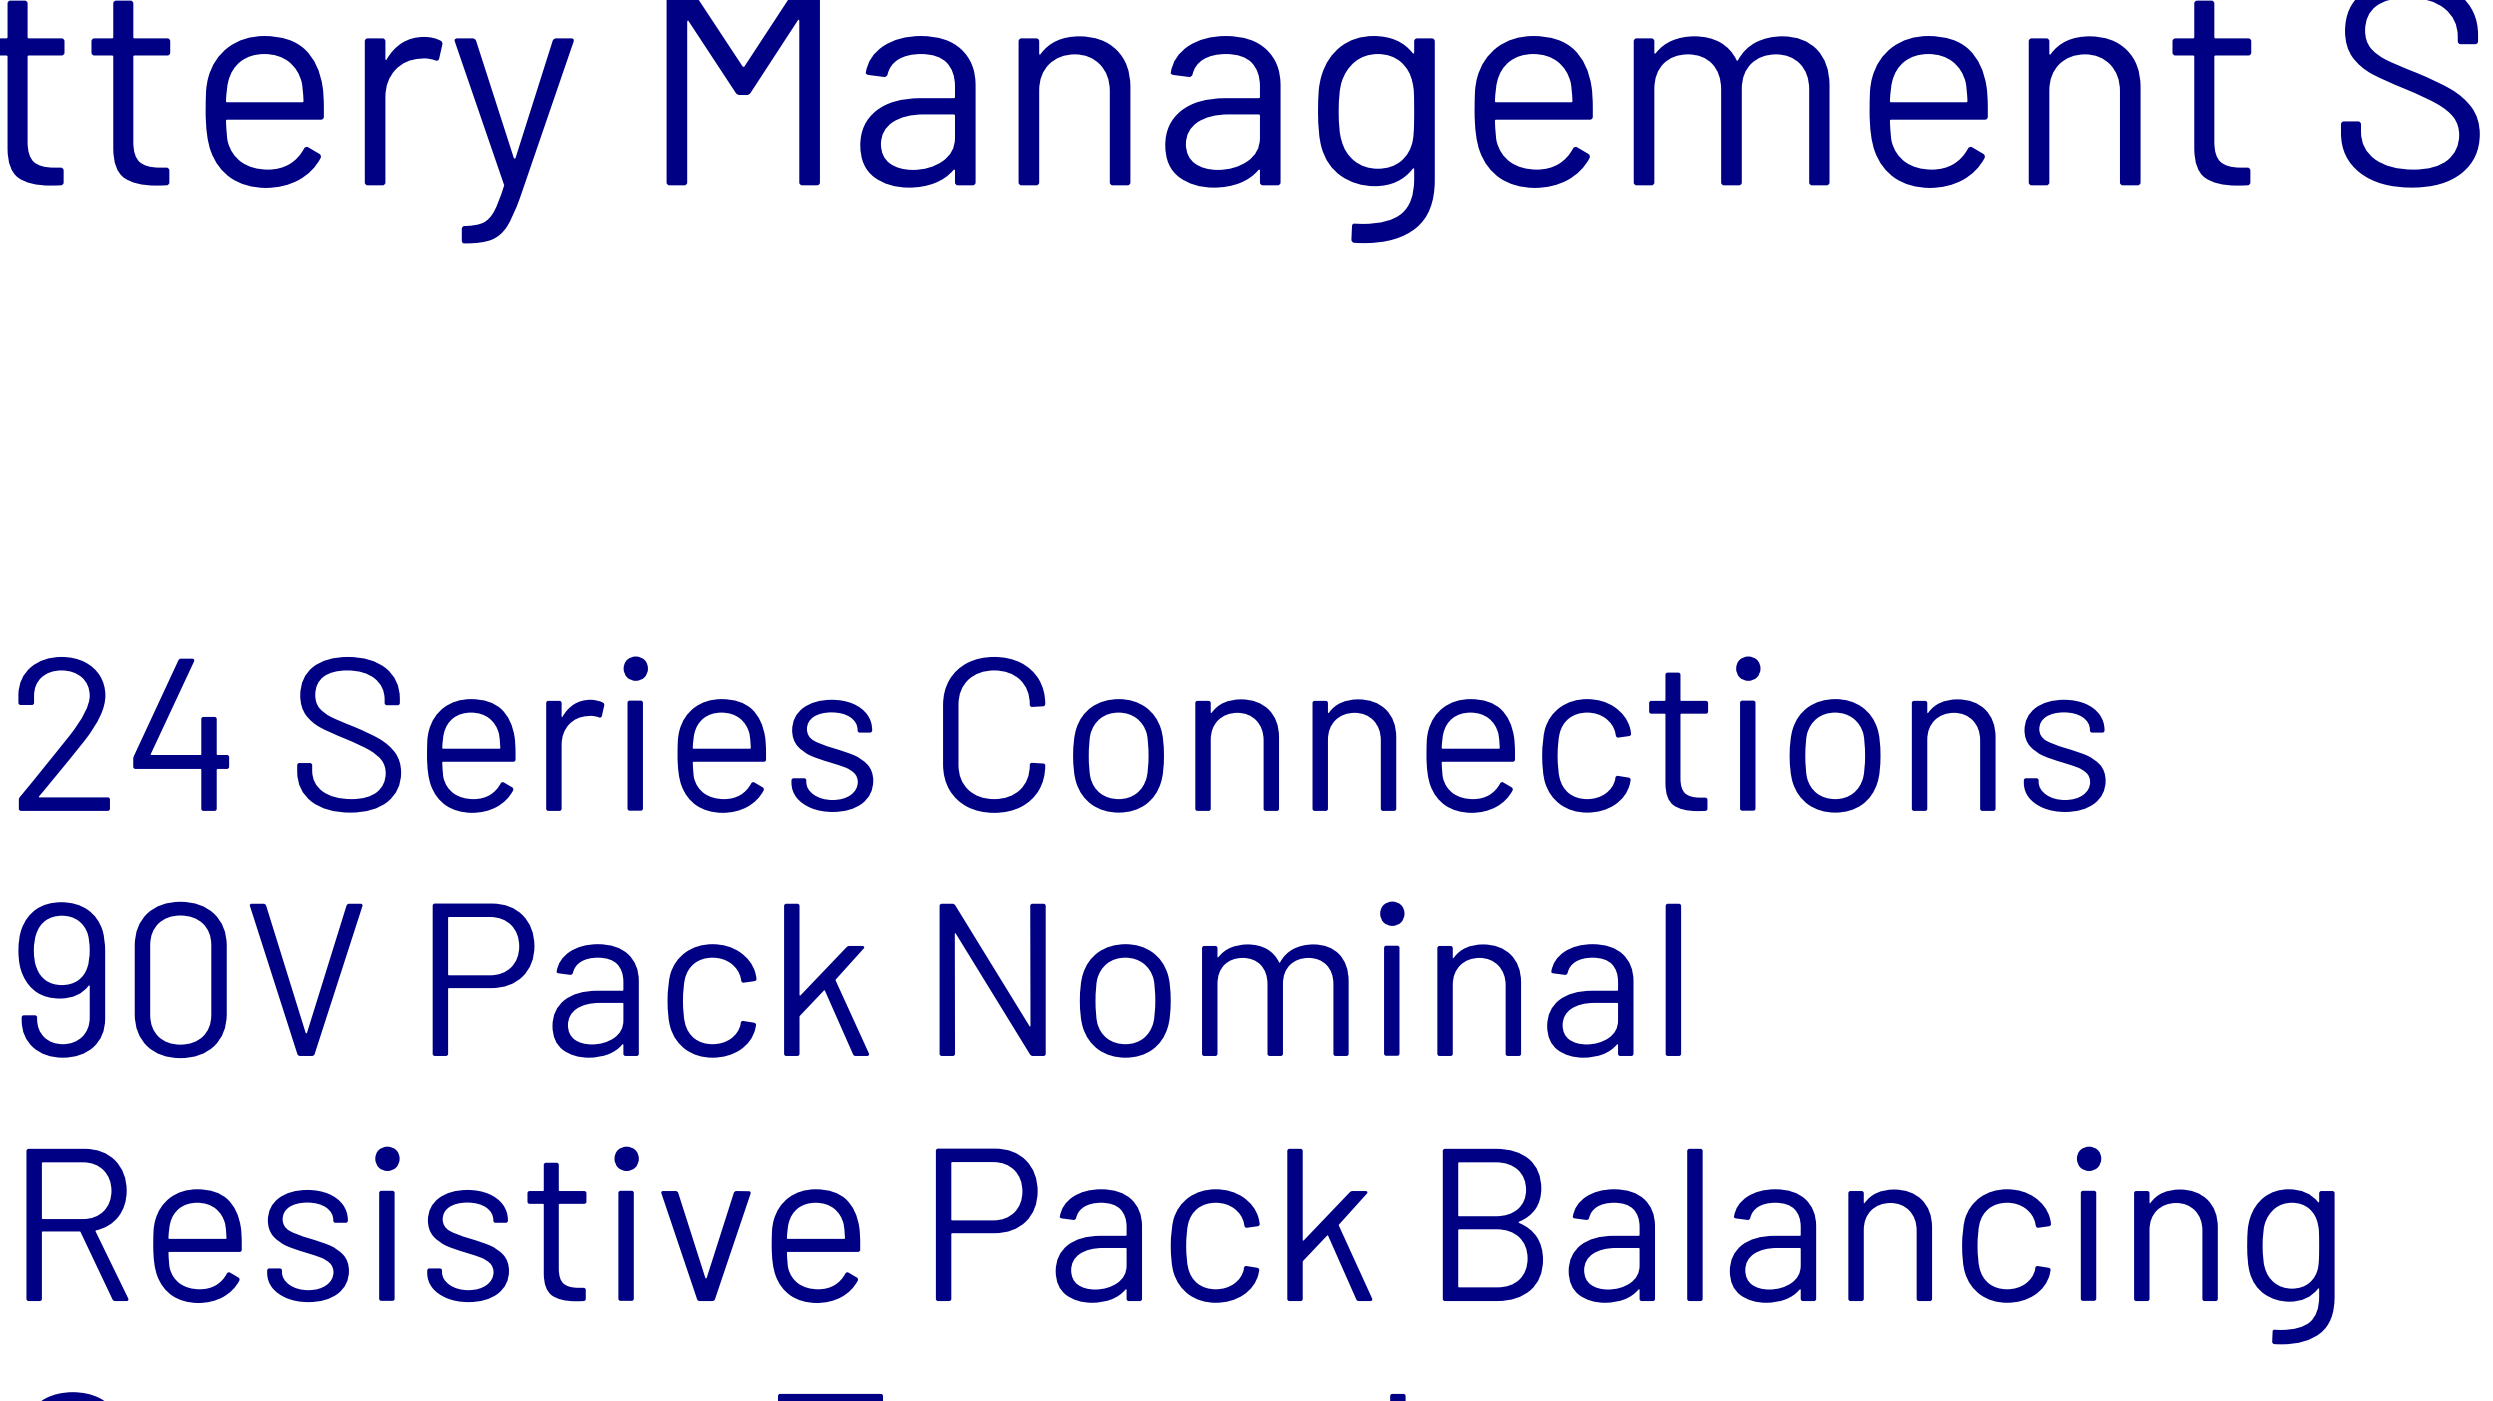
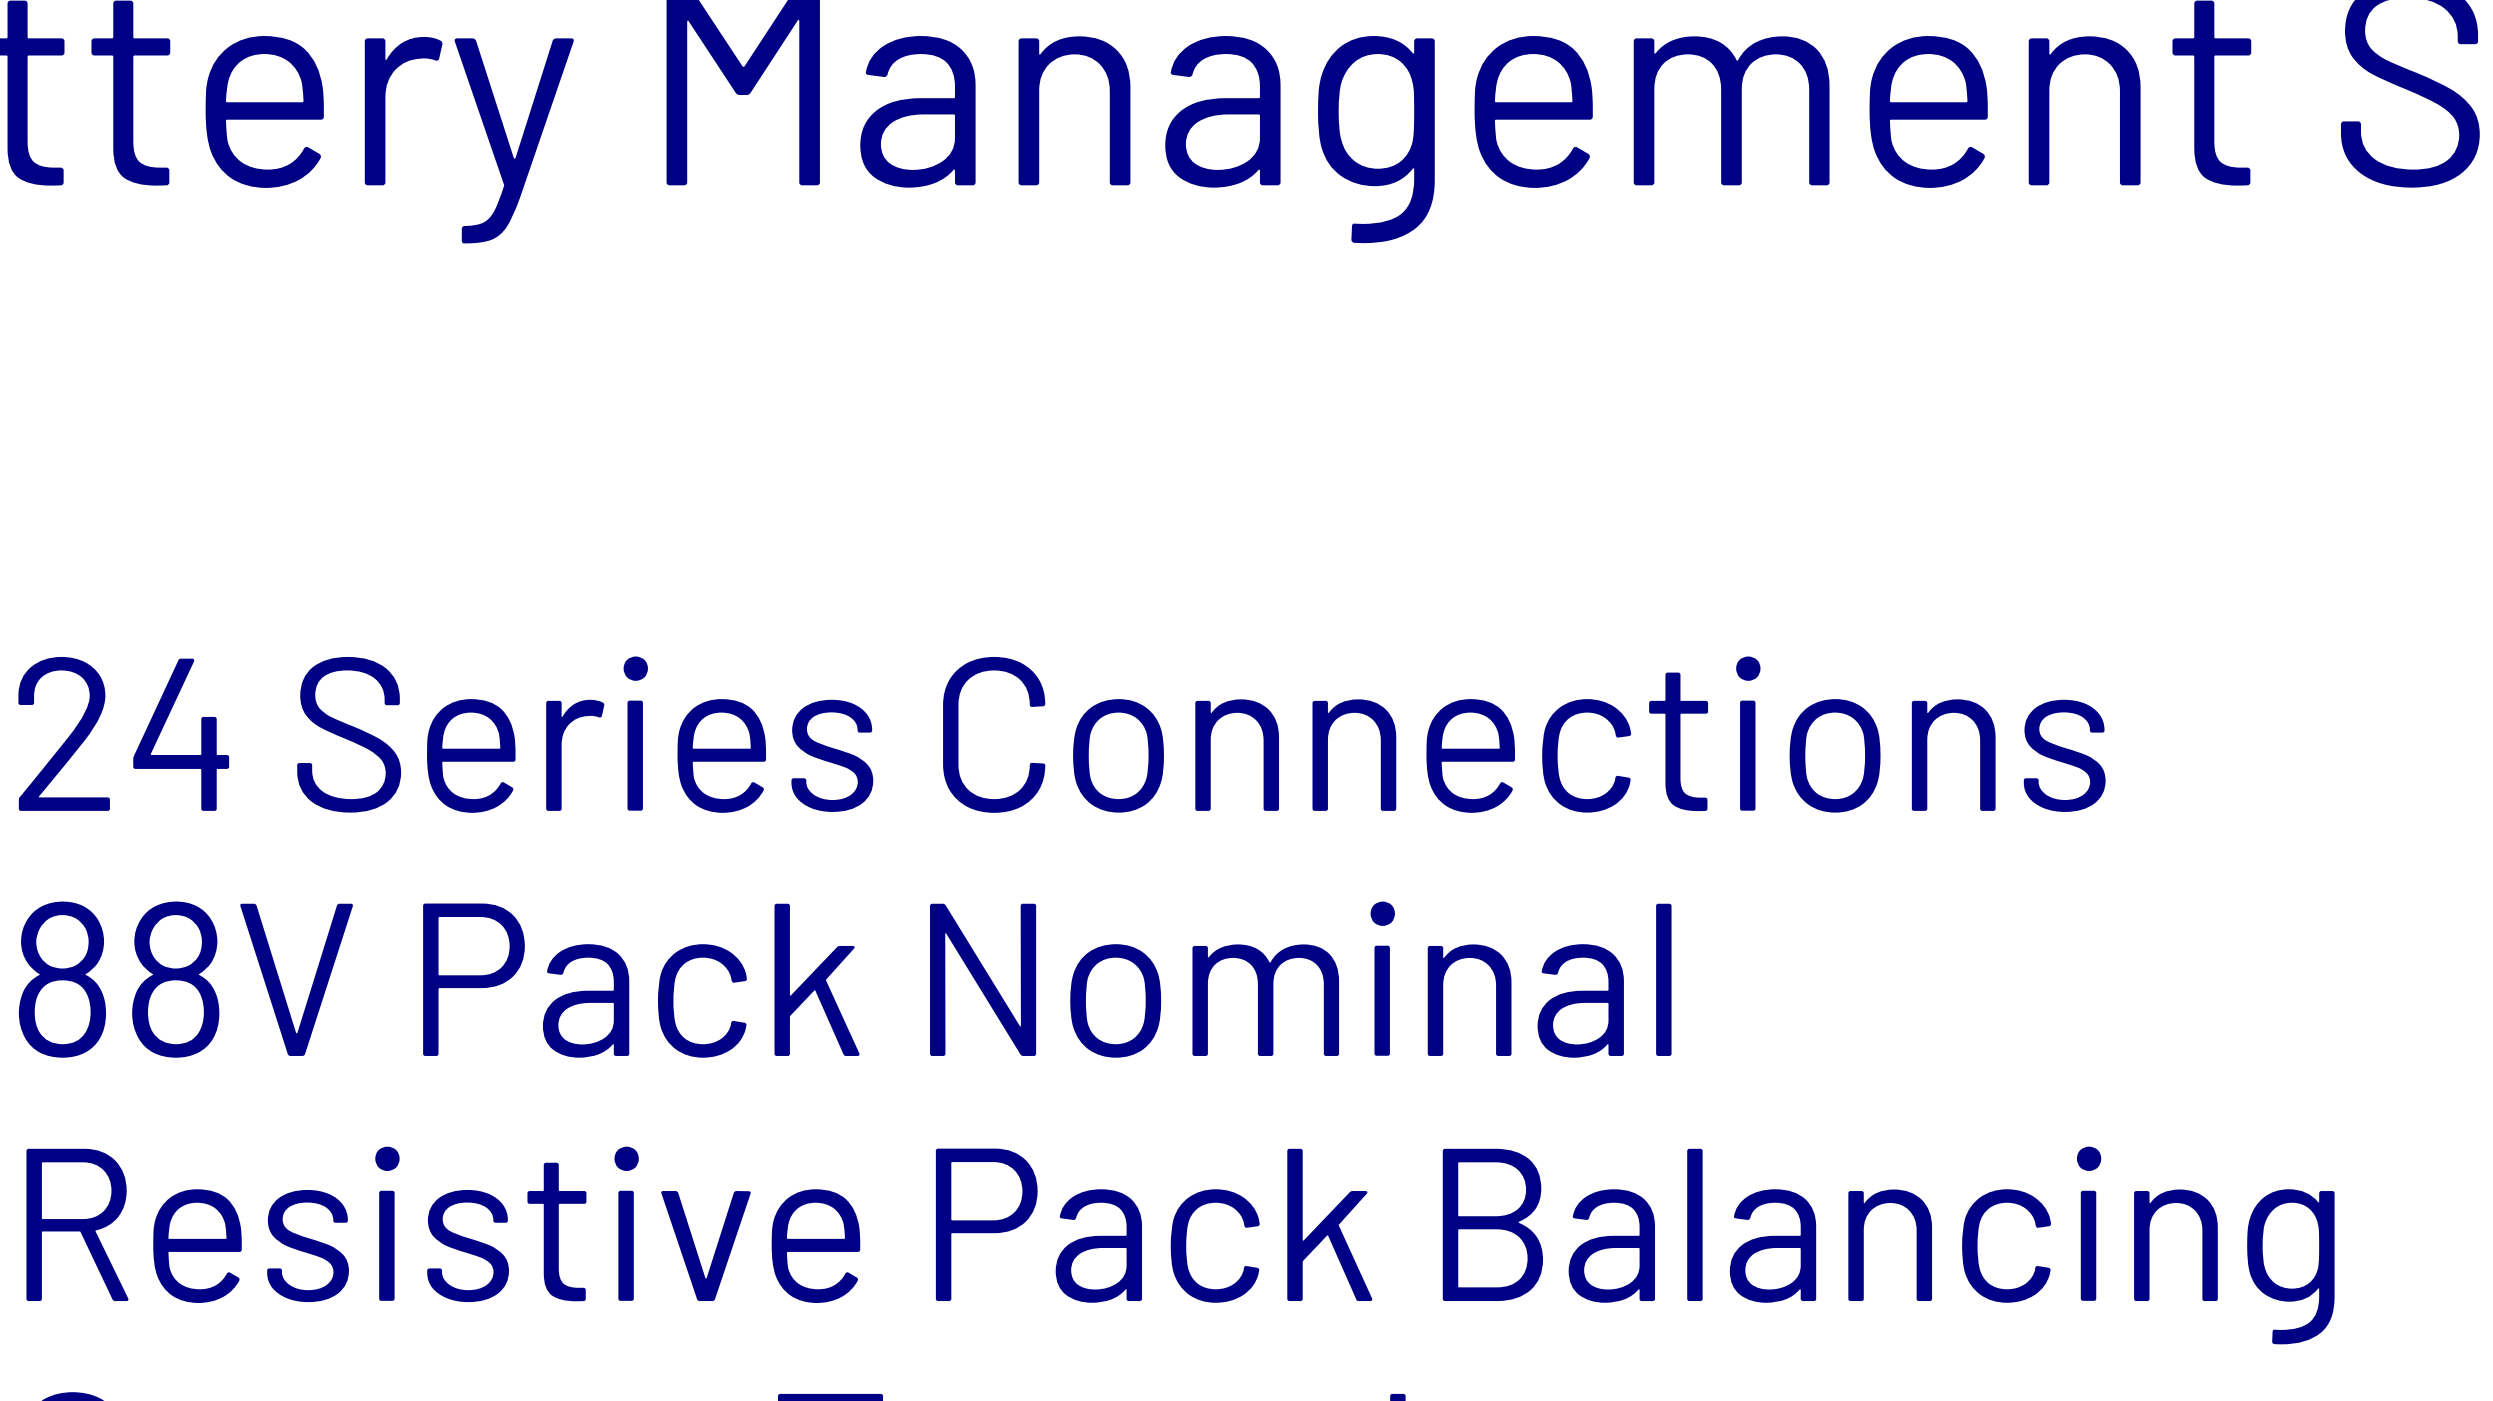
text: 90V Pack Nominal (849, 979) -> 88V Pack Nominal (845, 979)

